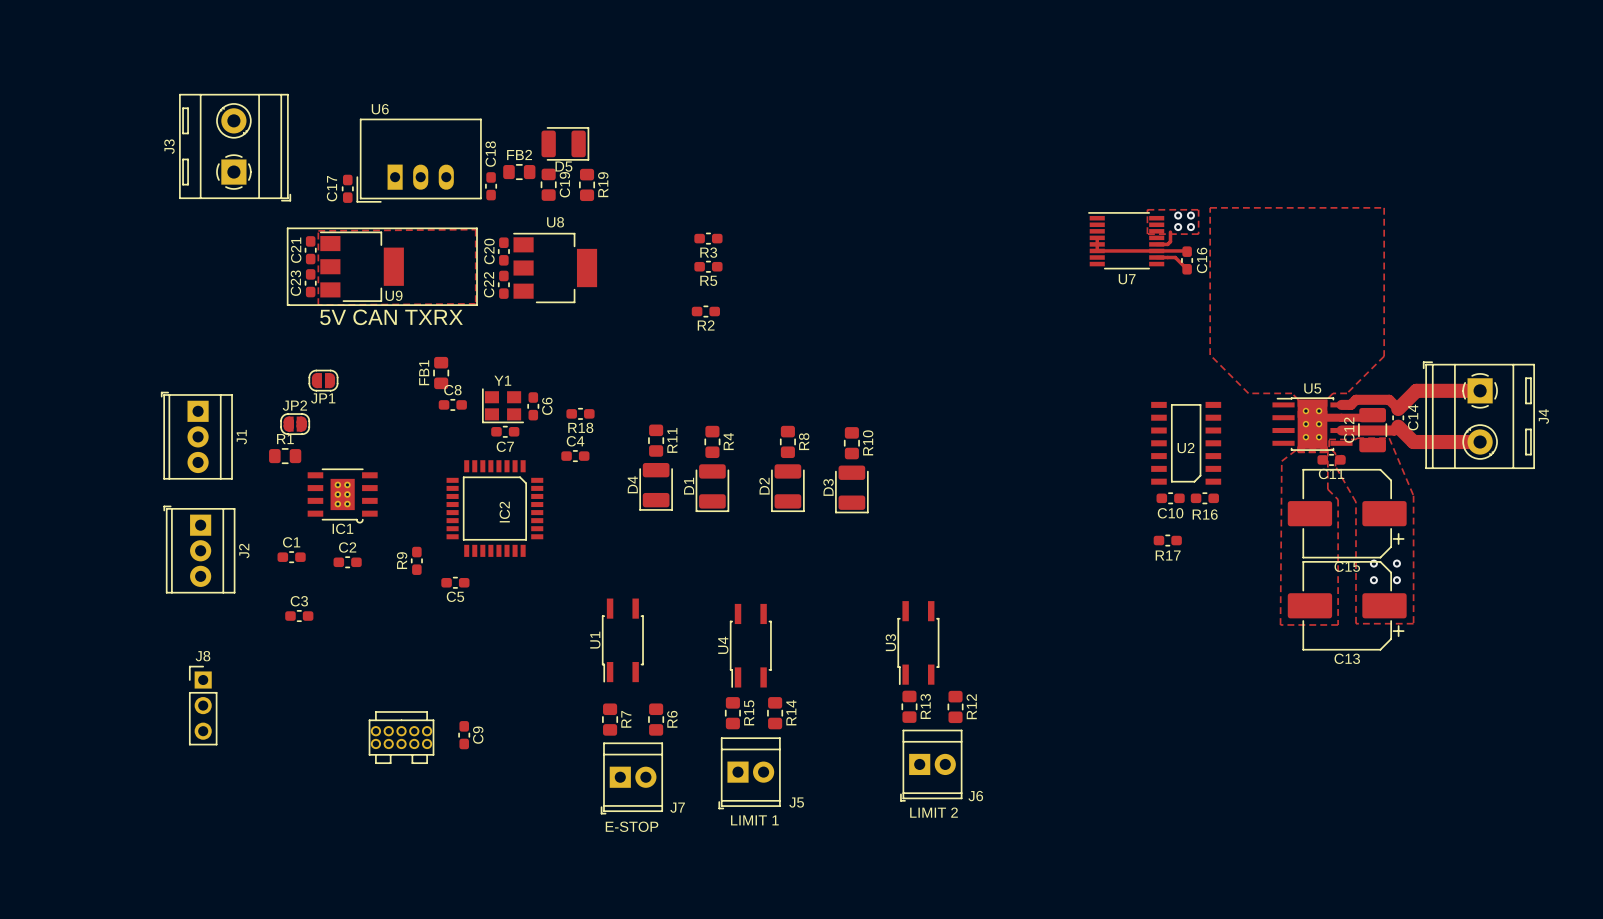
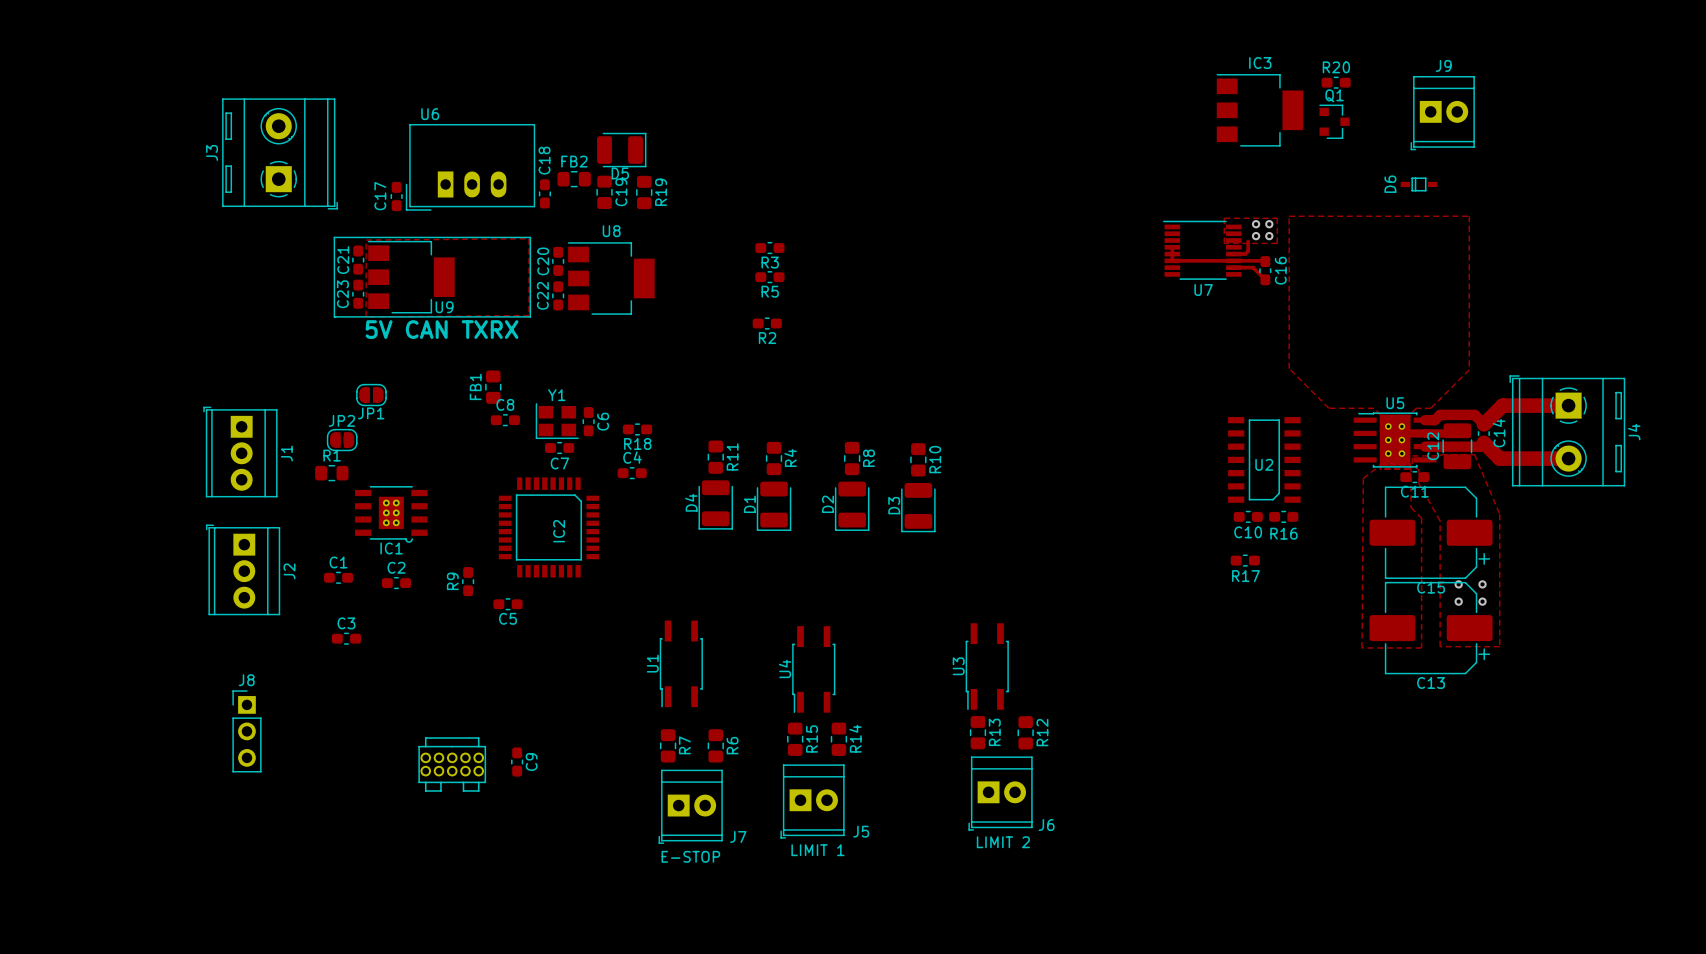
R20: none -> (1336, 82)
IC3: none -> (1259, 110)
J9: none -> (1442, 113)
Q1: none -> (1334, 121)
D6: none -> (1418, 184)

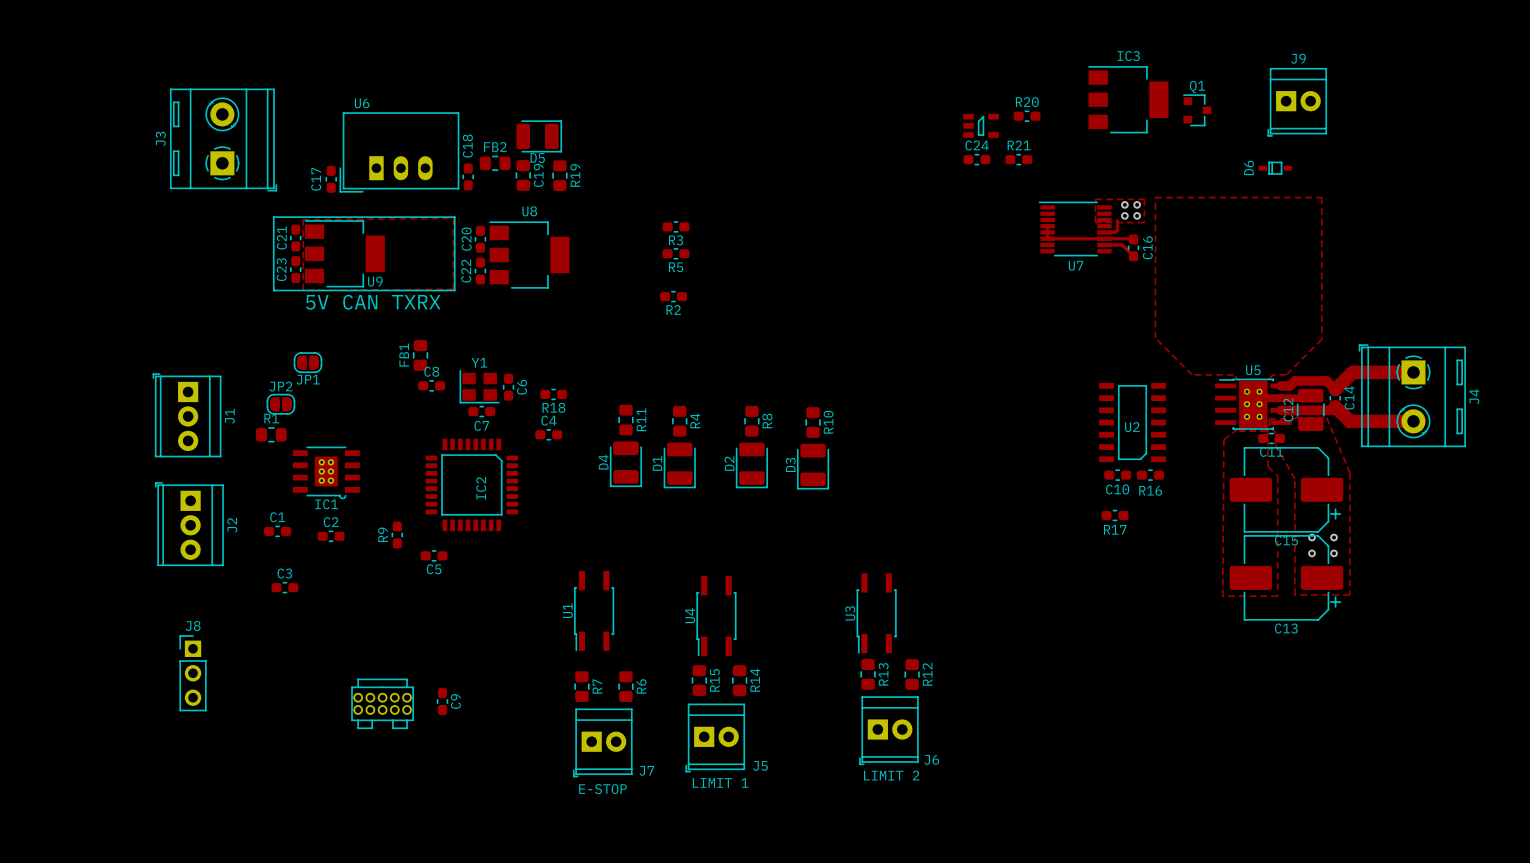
R20 position: (1336, 82) -> (1027, 116)
part: none -> (981, 125)
C24: none -> (976, 159)
R21: none -> (1018, 159)

